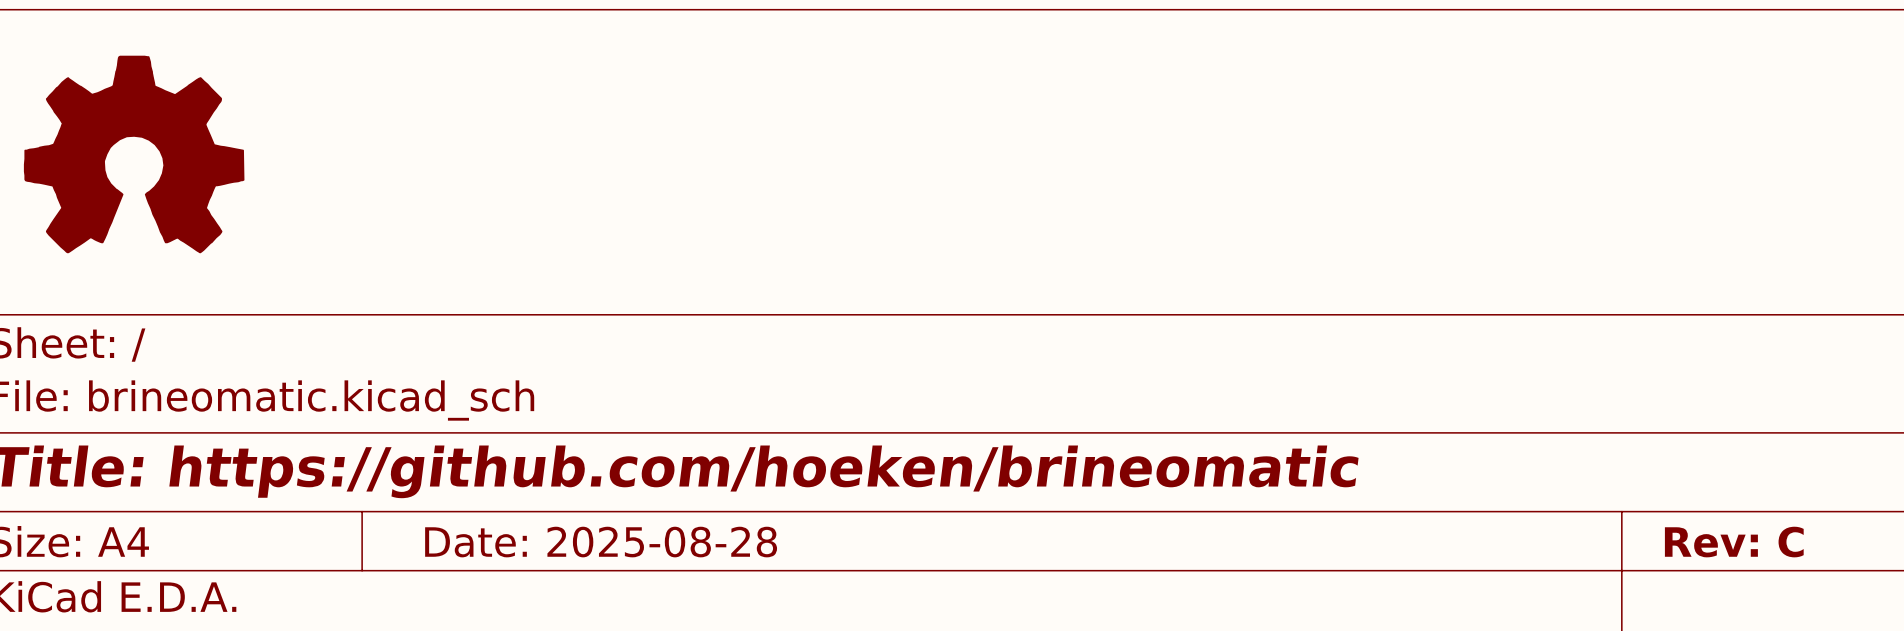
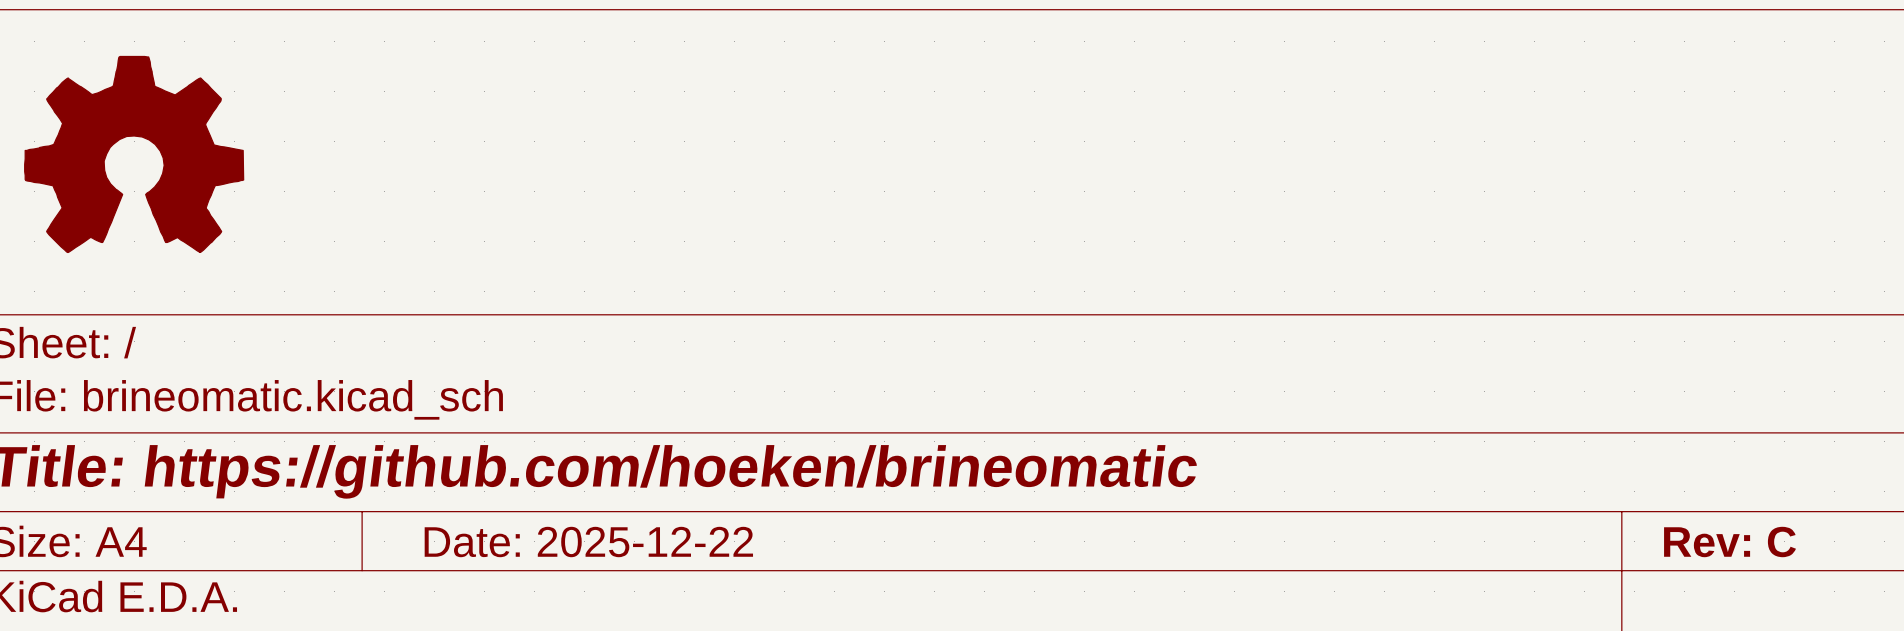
title block: Date: 2025-08-28 (601, 542) -> Date: 2025-12-22 (588, 542)

